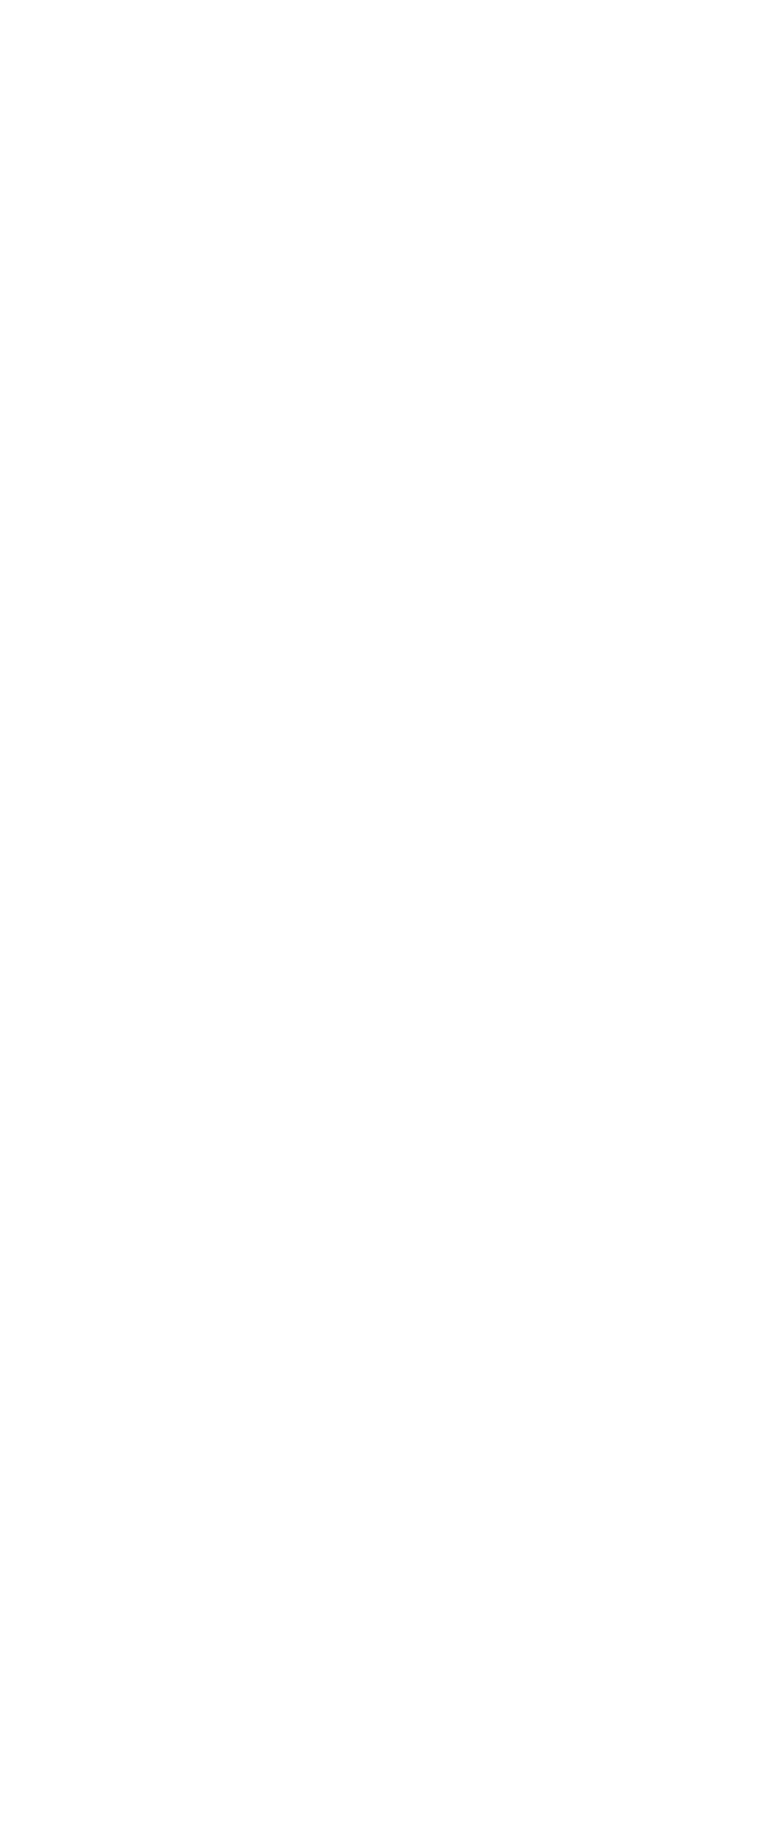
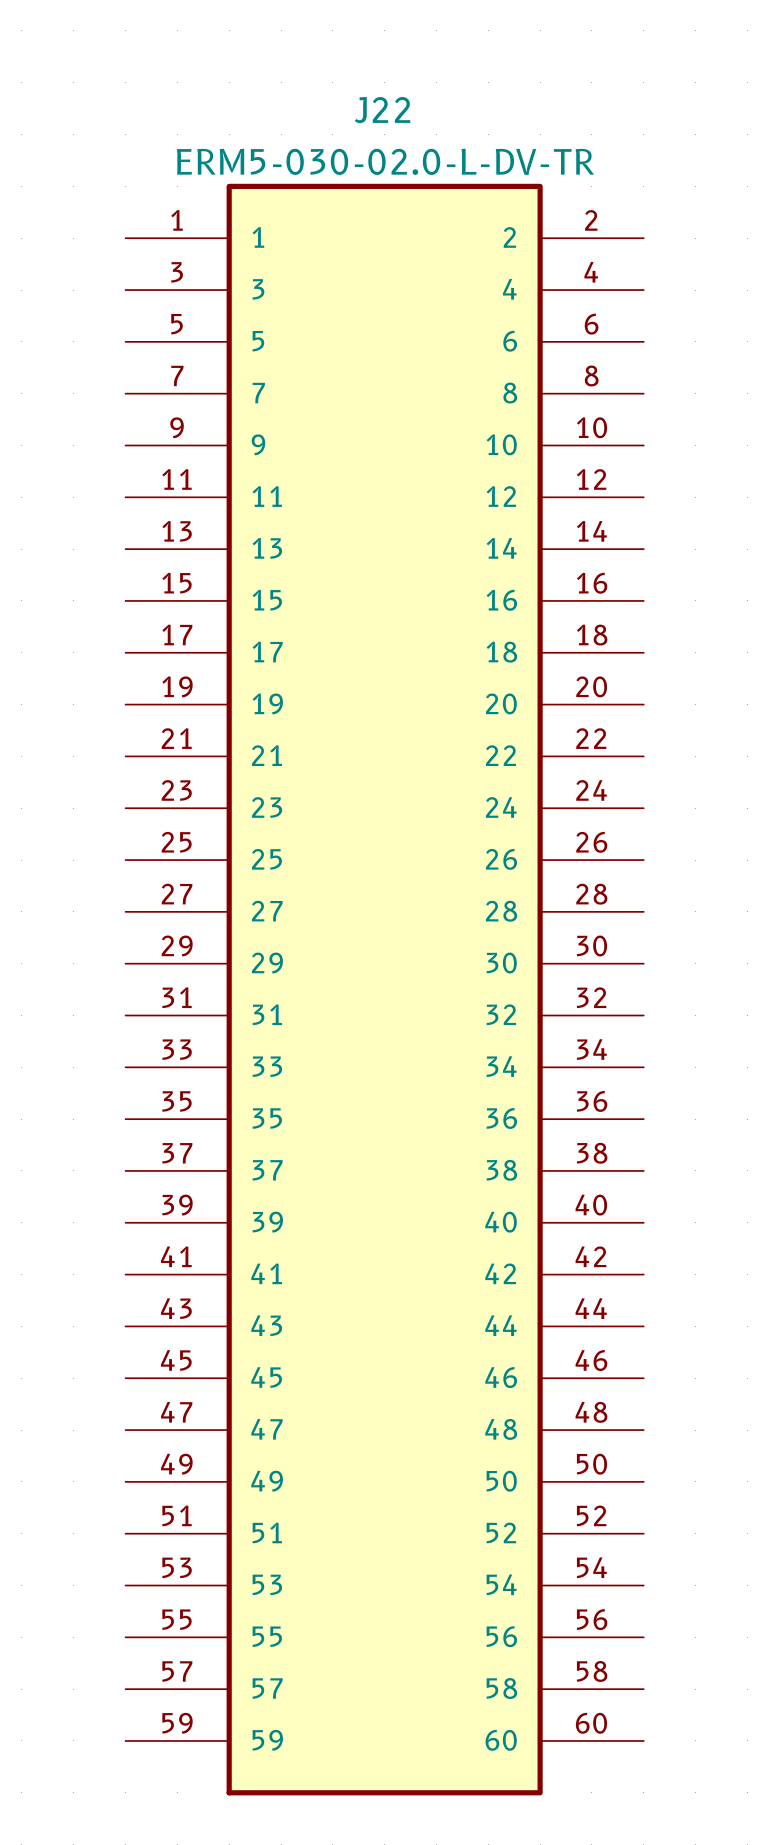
J22: none -> ERM5-030-02.0-L-DV-TR (384, 989)

